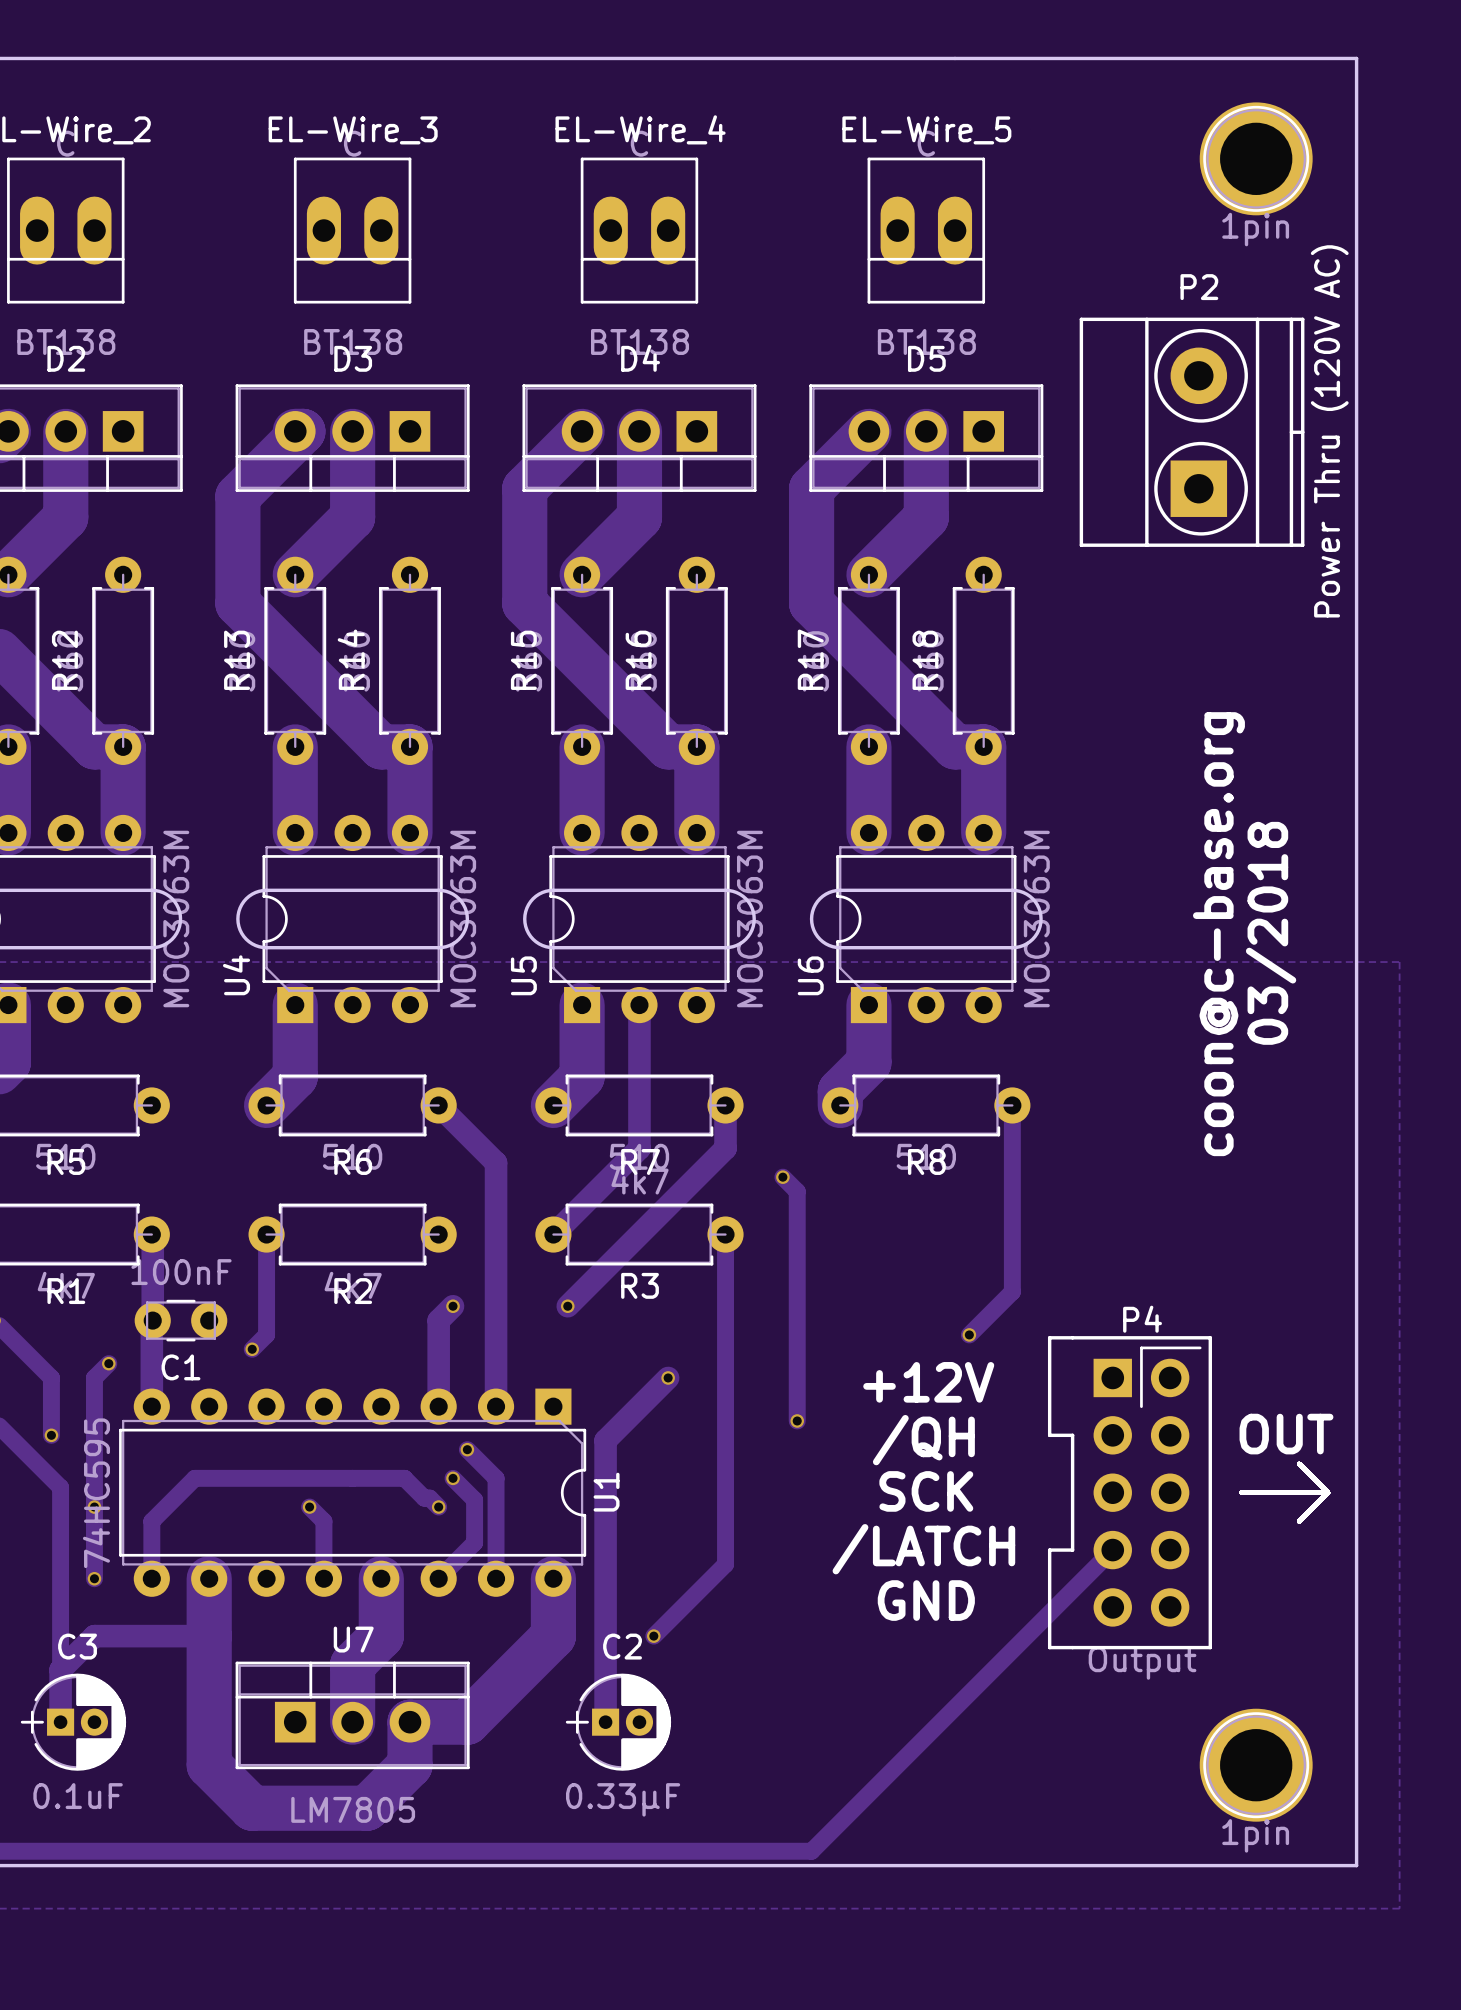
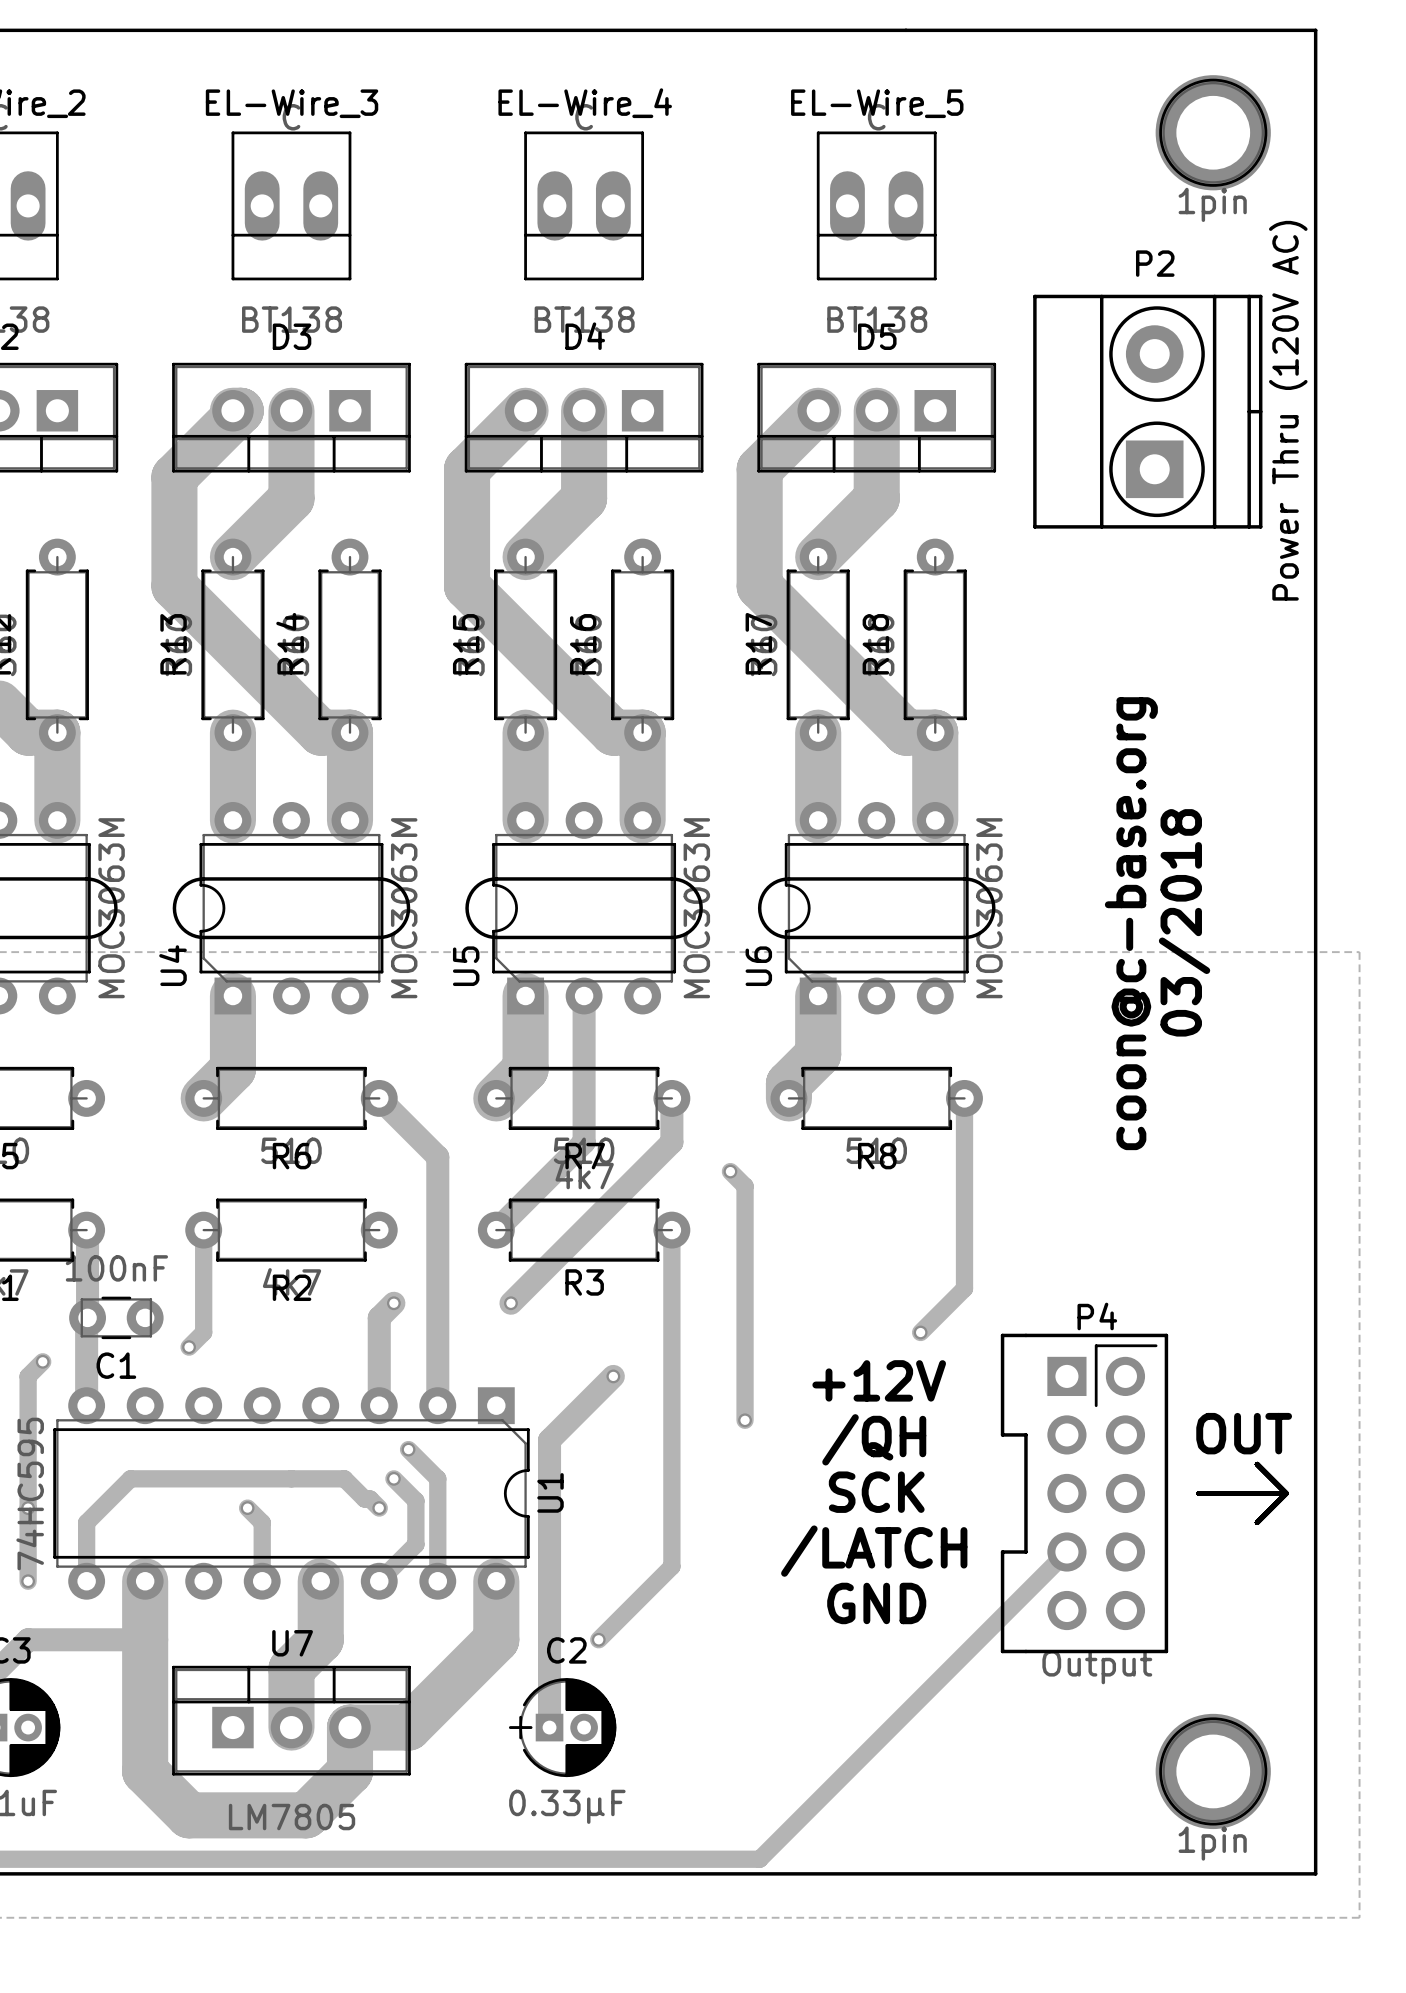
text: 03/2018 (1271, 933) -> none
text: none -> coon@c-base.org (1131, 923)
text: coon@c-base.org (1218, 934) -> 03/2018 (1184, 922)

